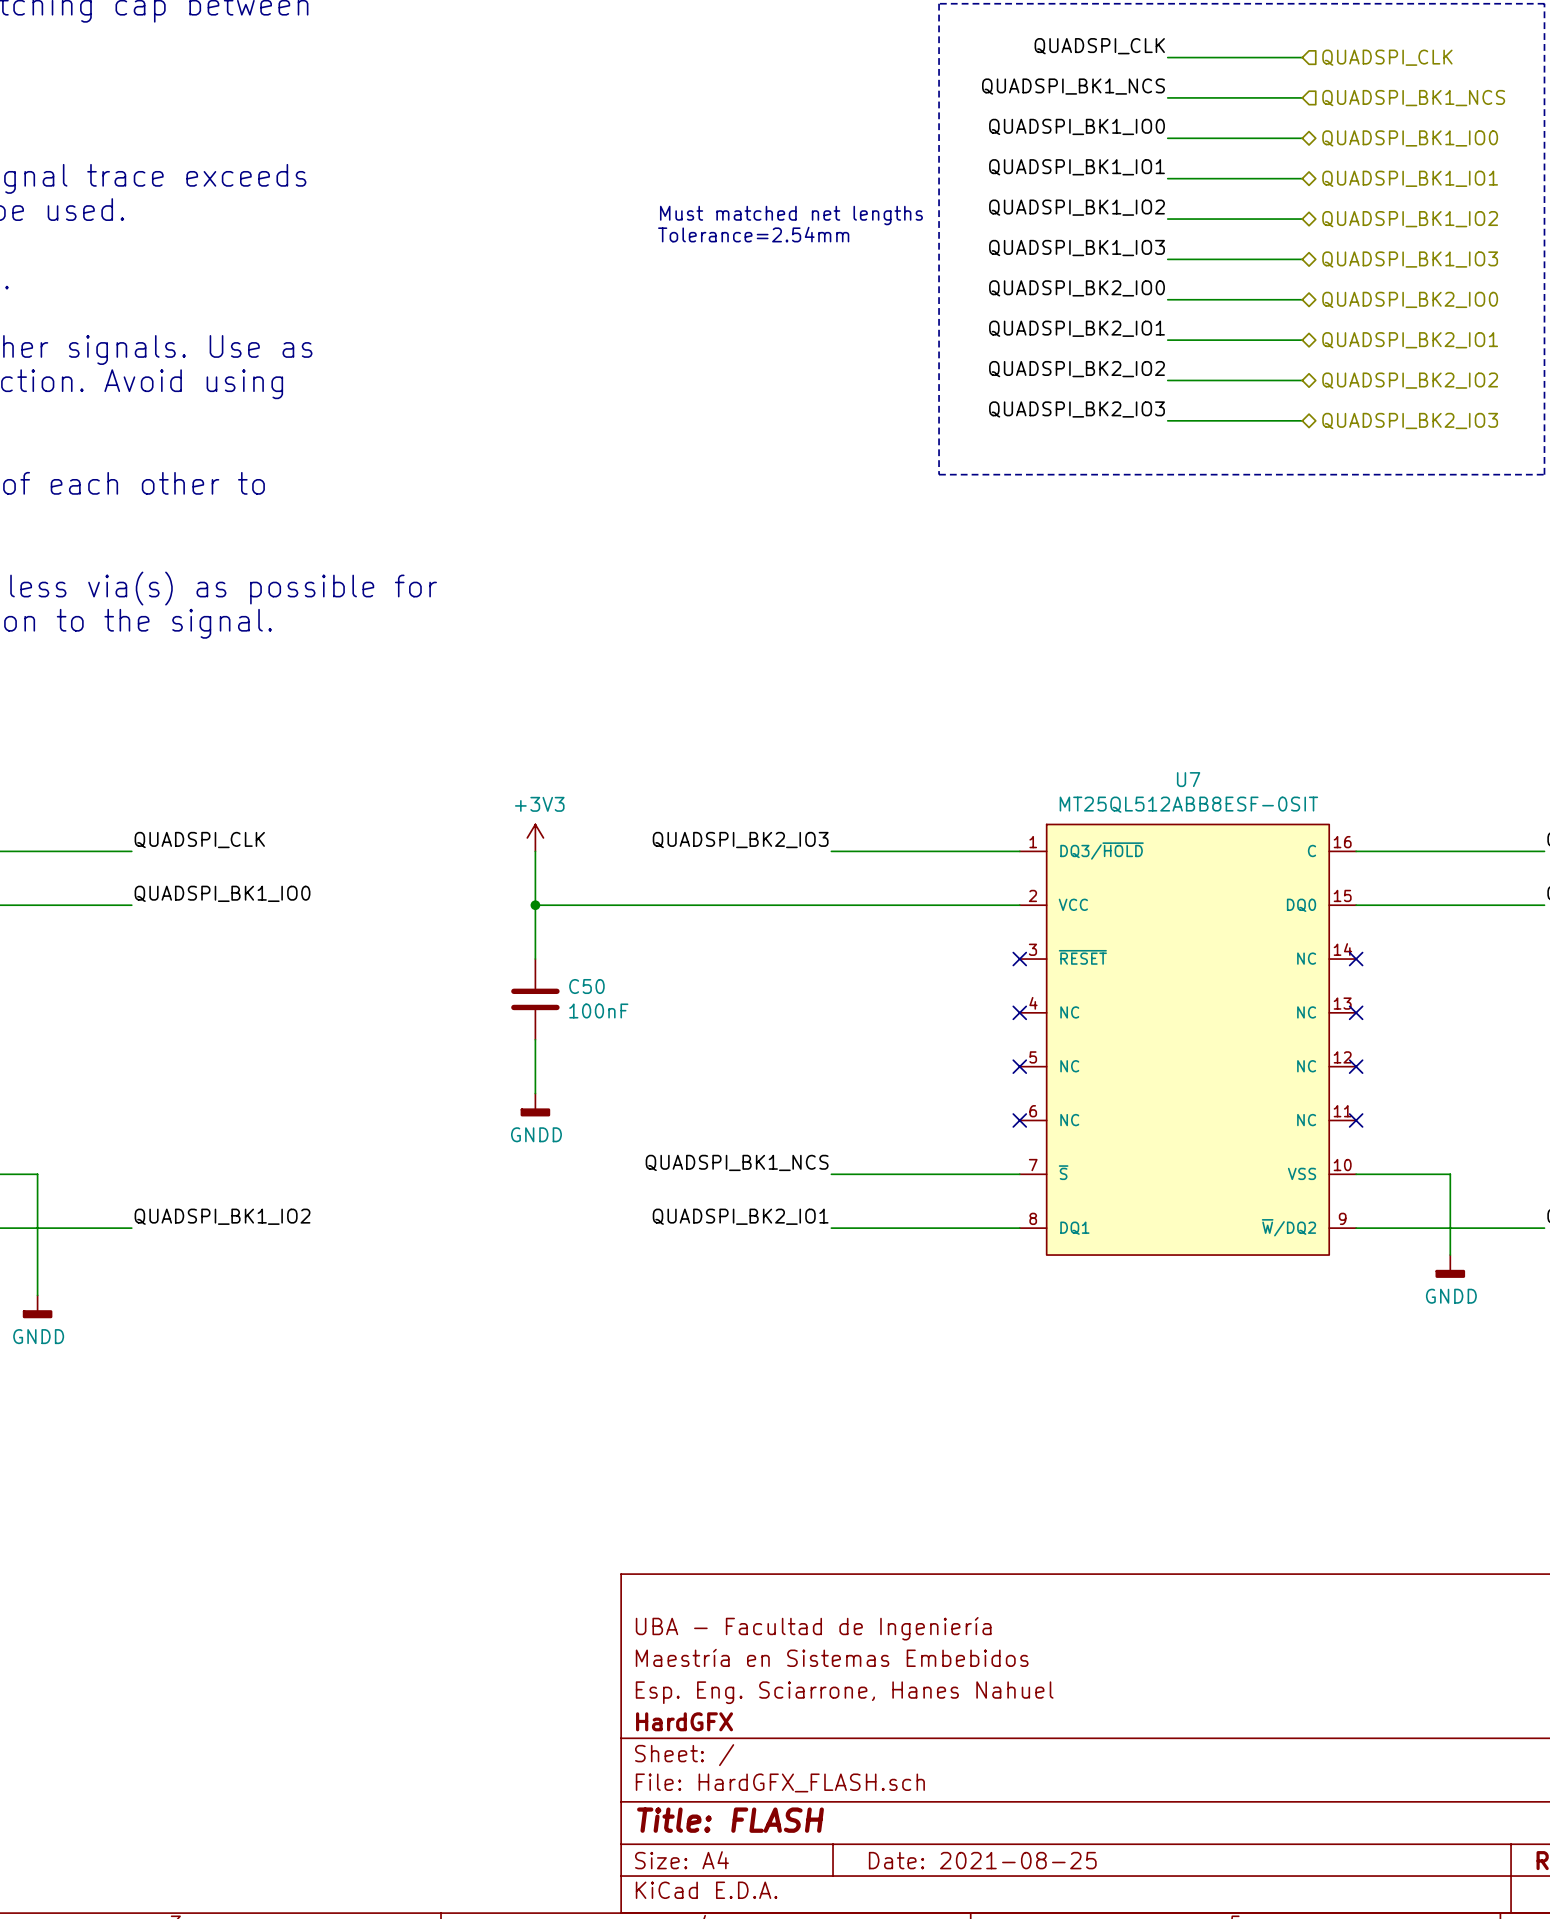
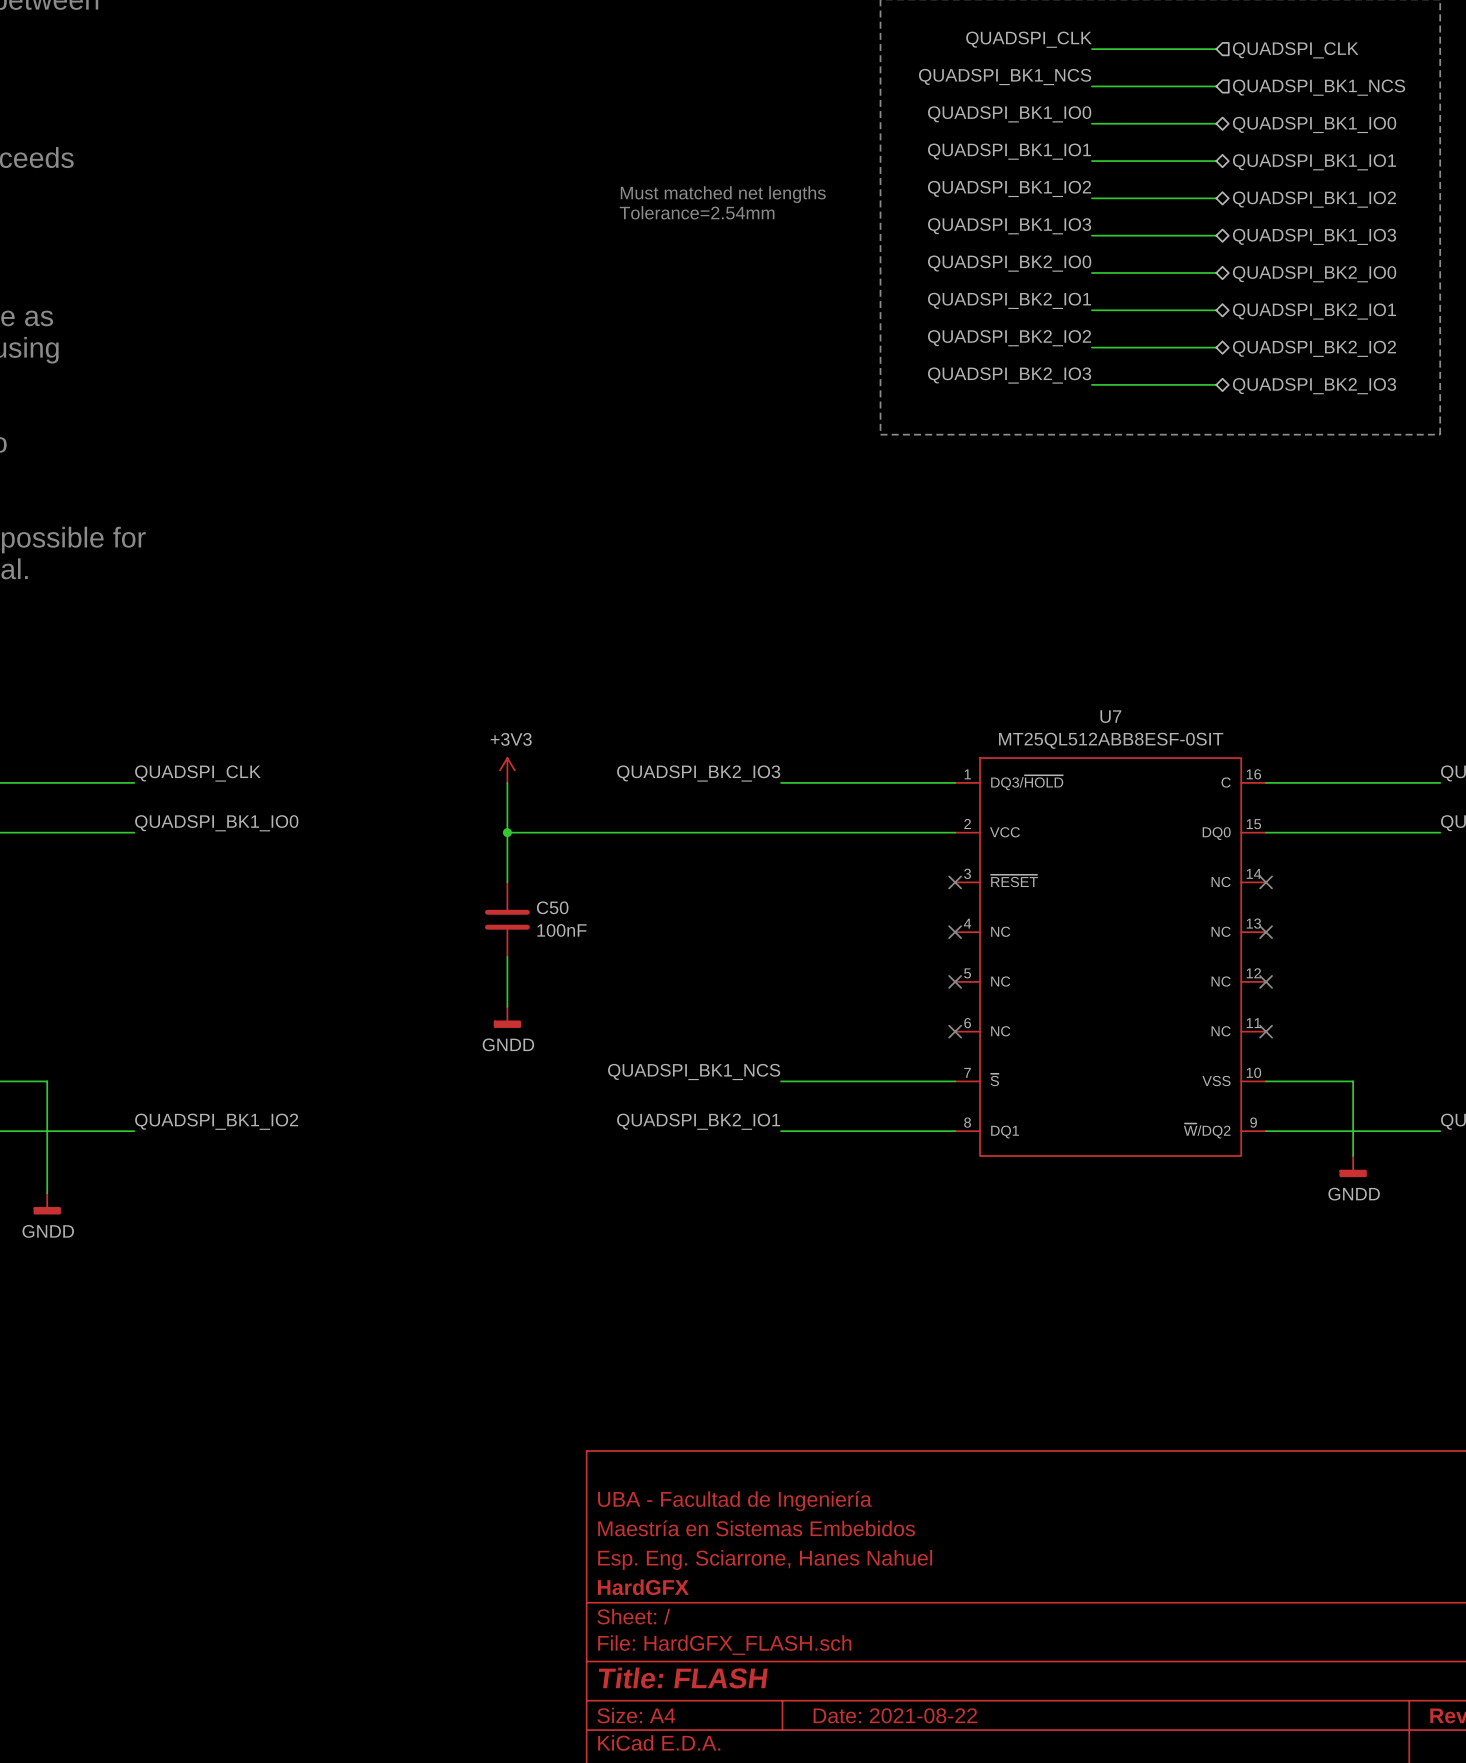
title block: Date: 2021-08-25 (982, 1860) -> Date: 2021-08-22 (895, 1715)

